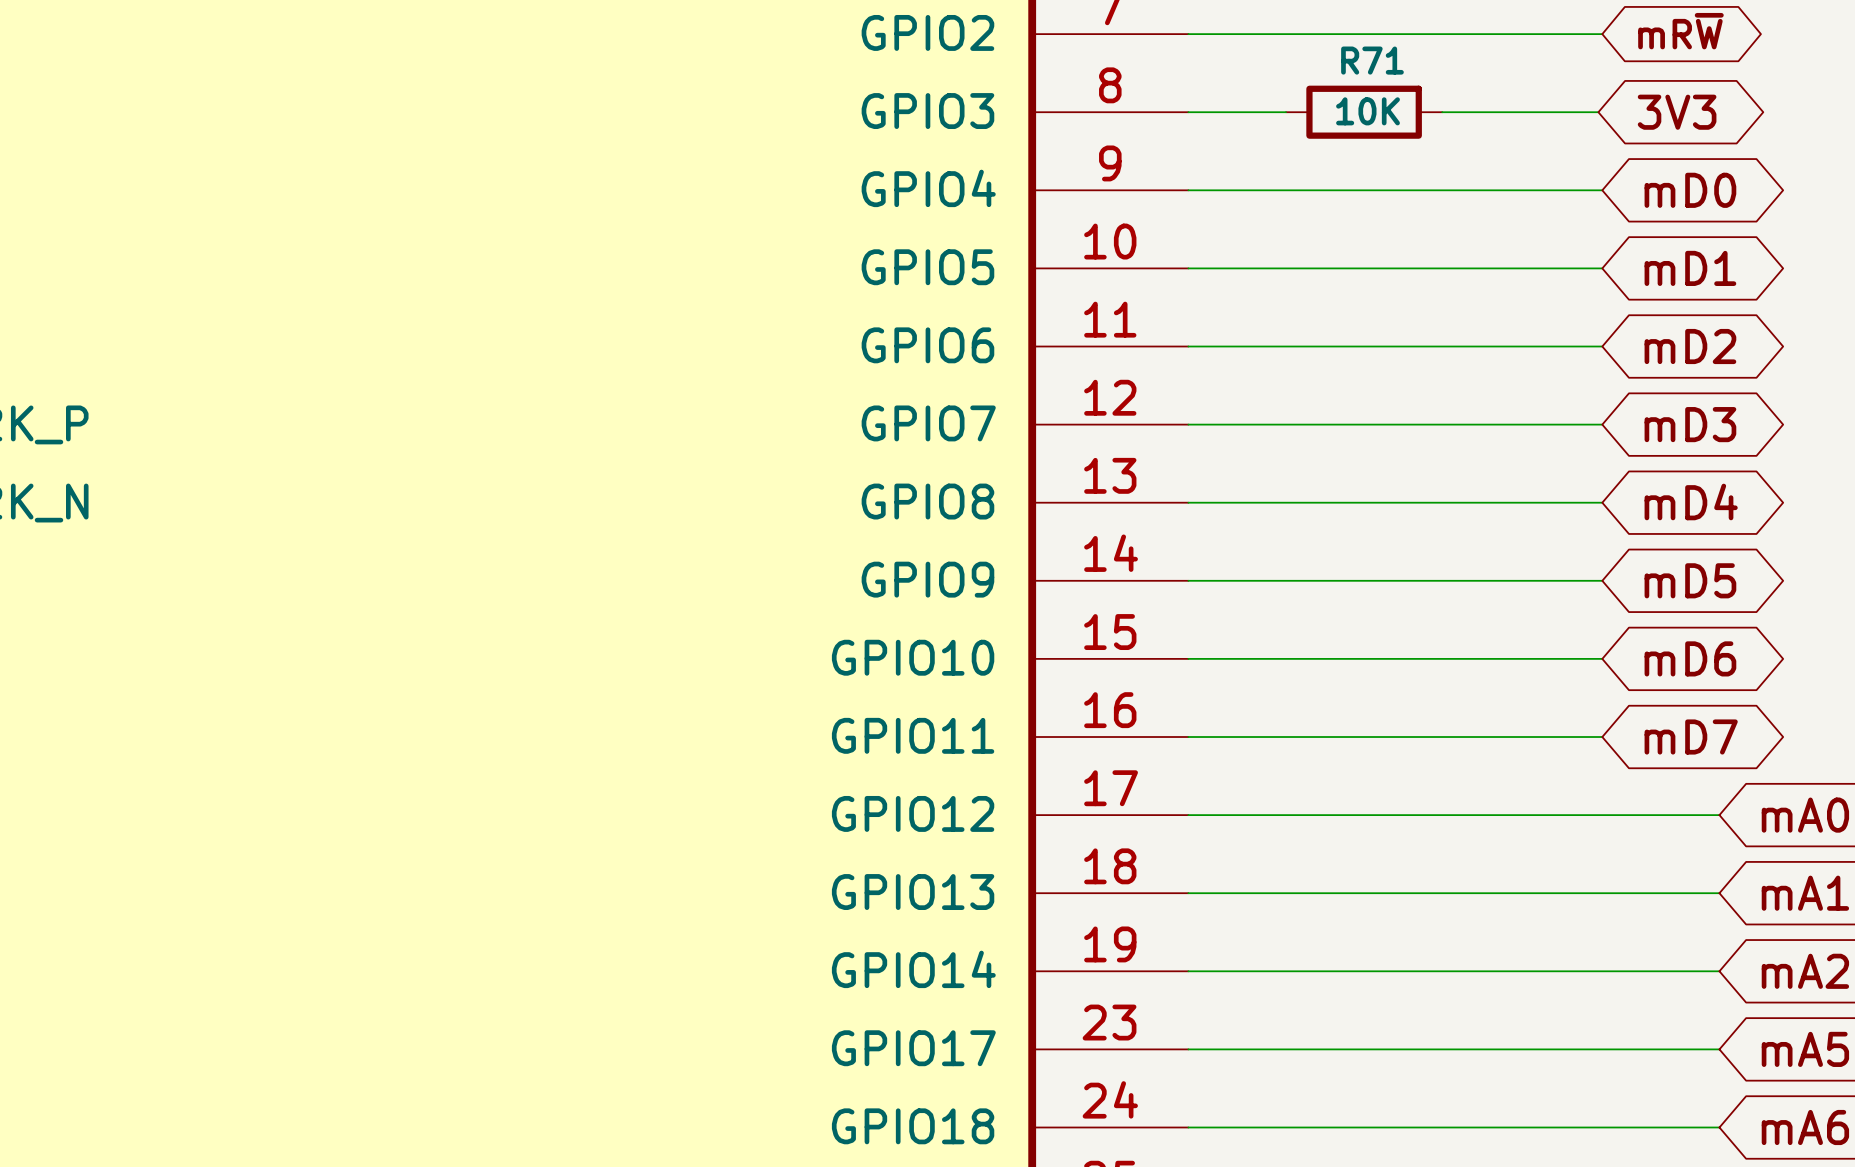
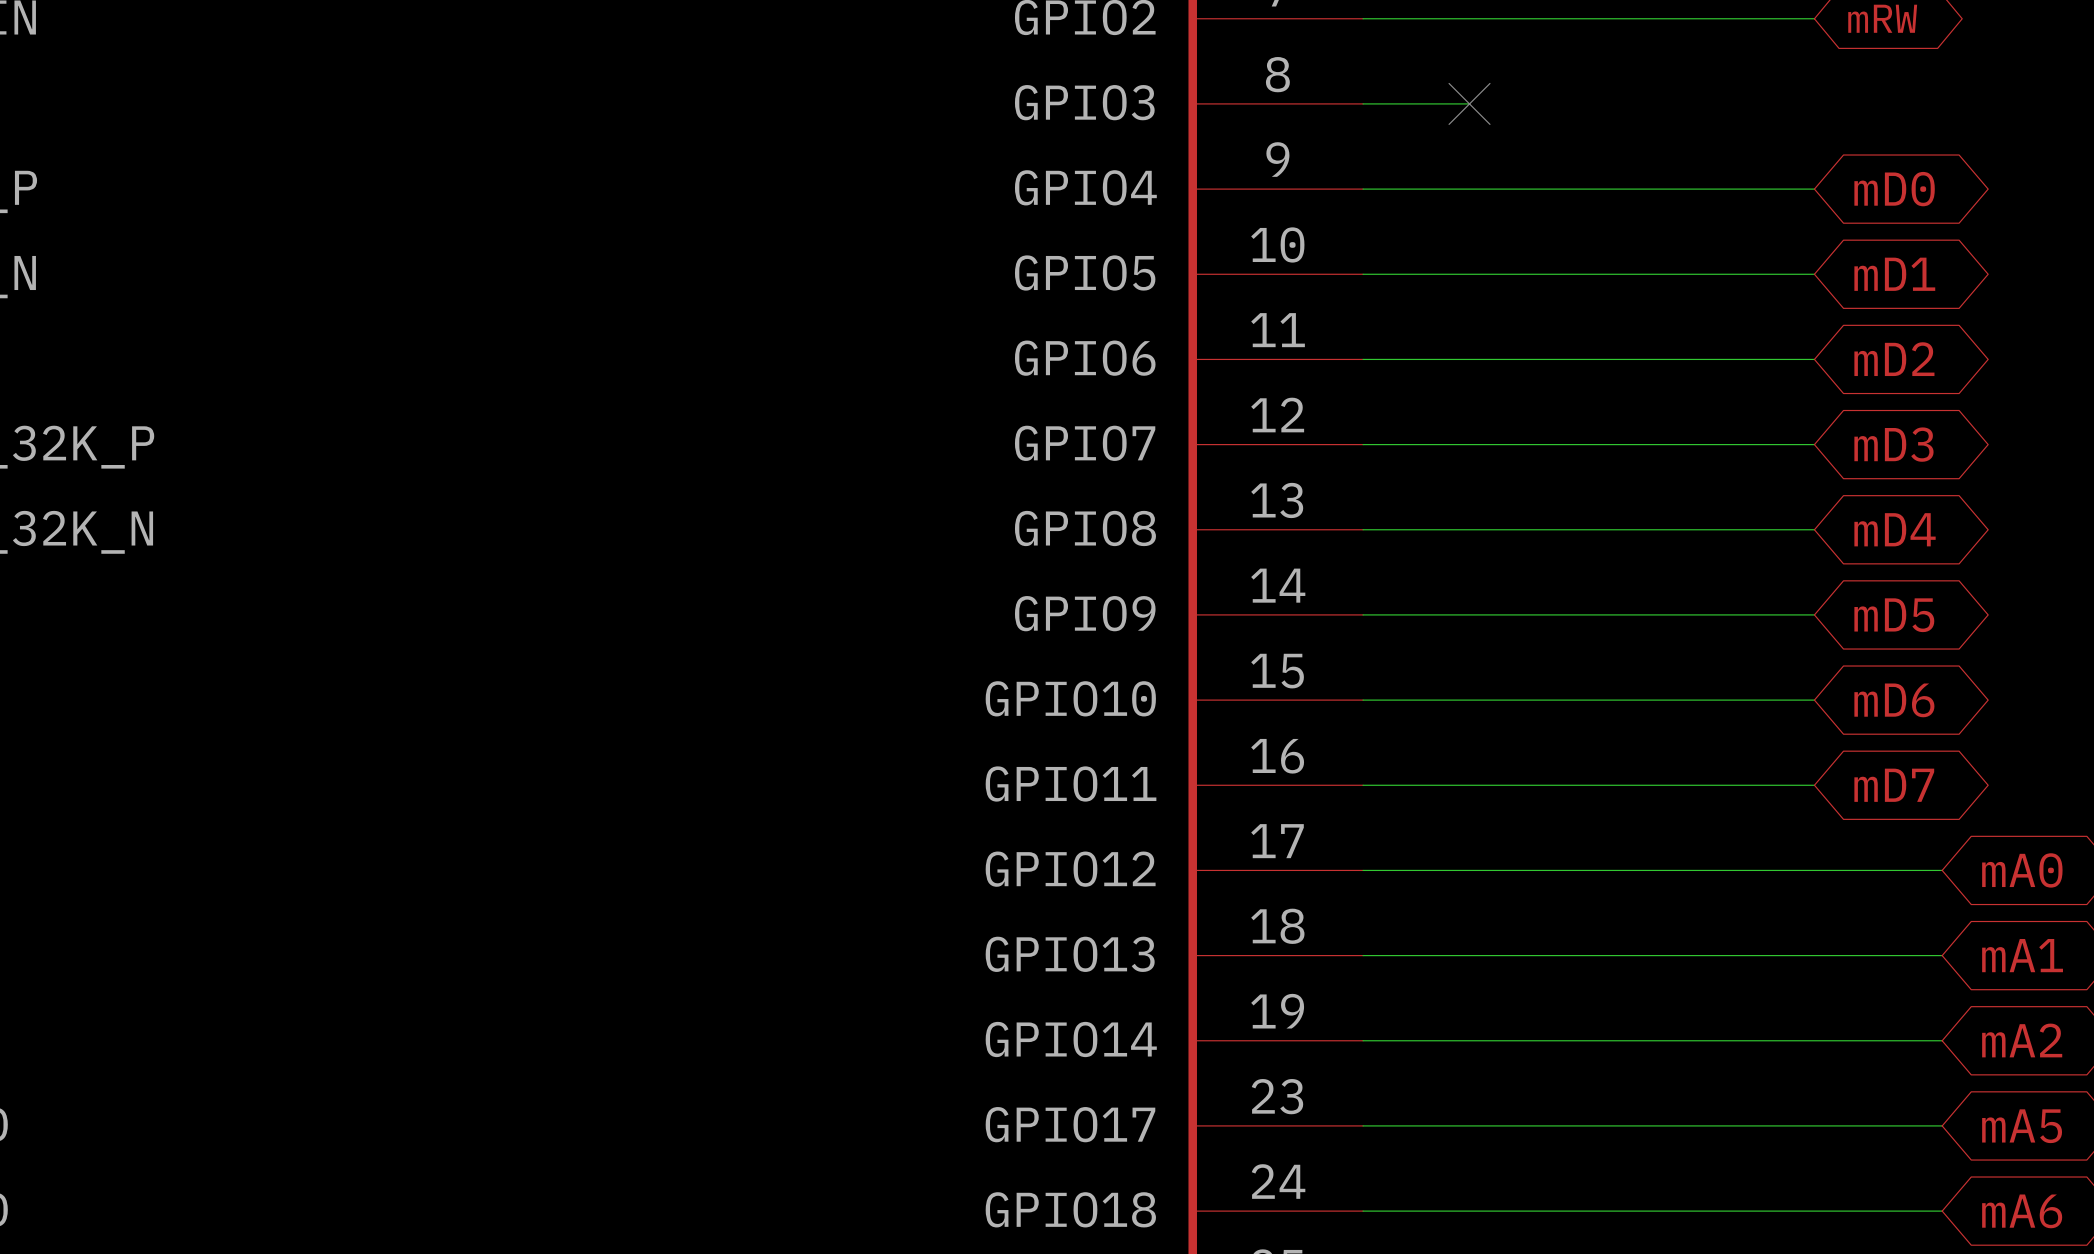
no-connect mark: none -> (1469, 103)
R71: 10K (1364, 112) -> none
wire: (1442, 112) (1598, 112) -> none
global label: 3V3 (1677, 112) -> none

